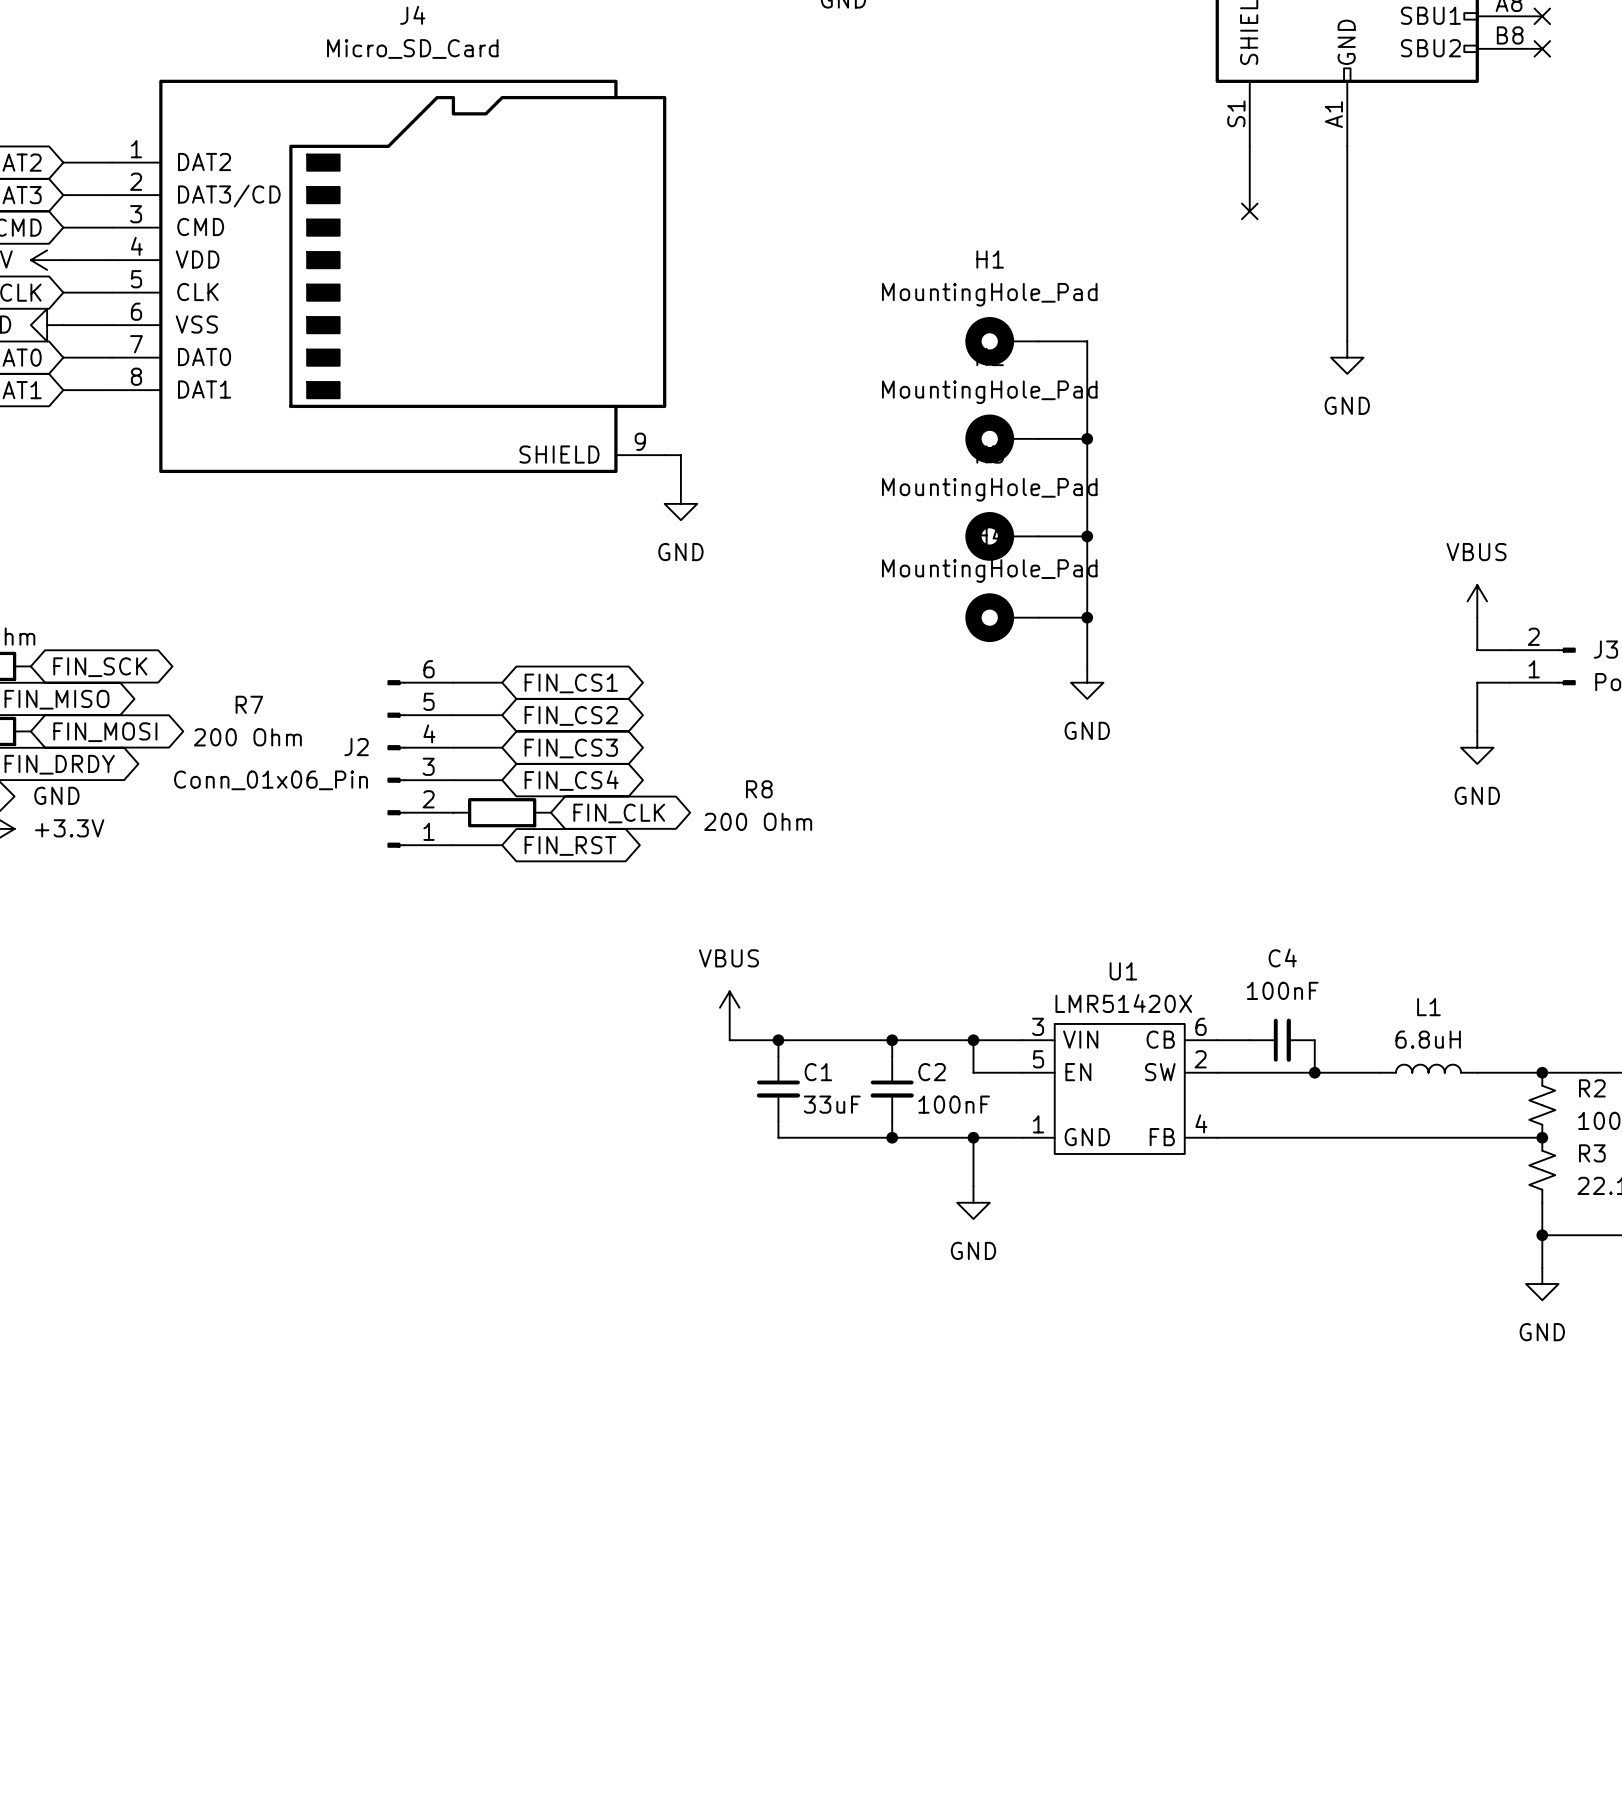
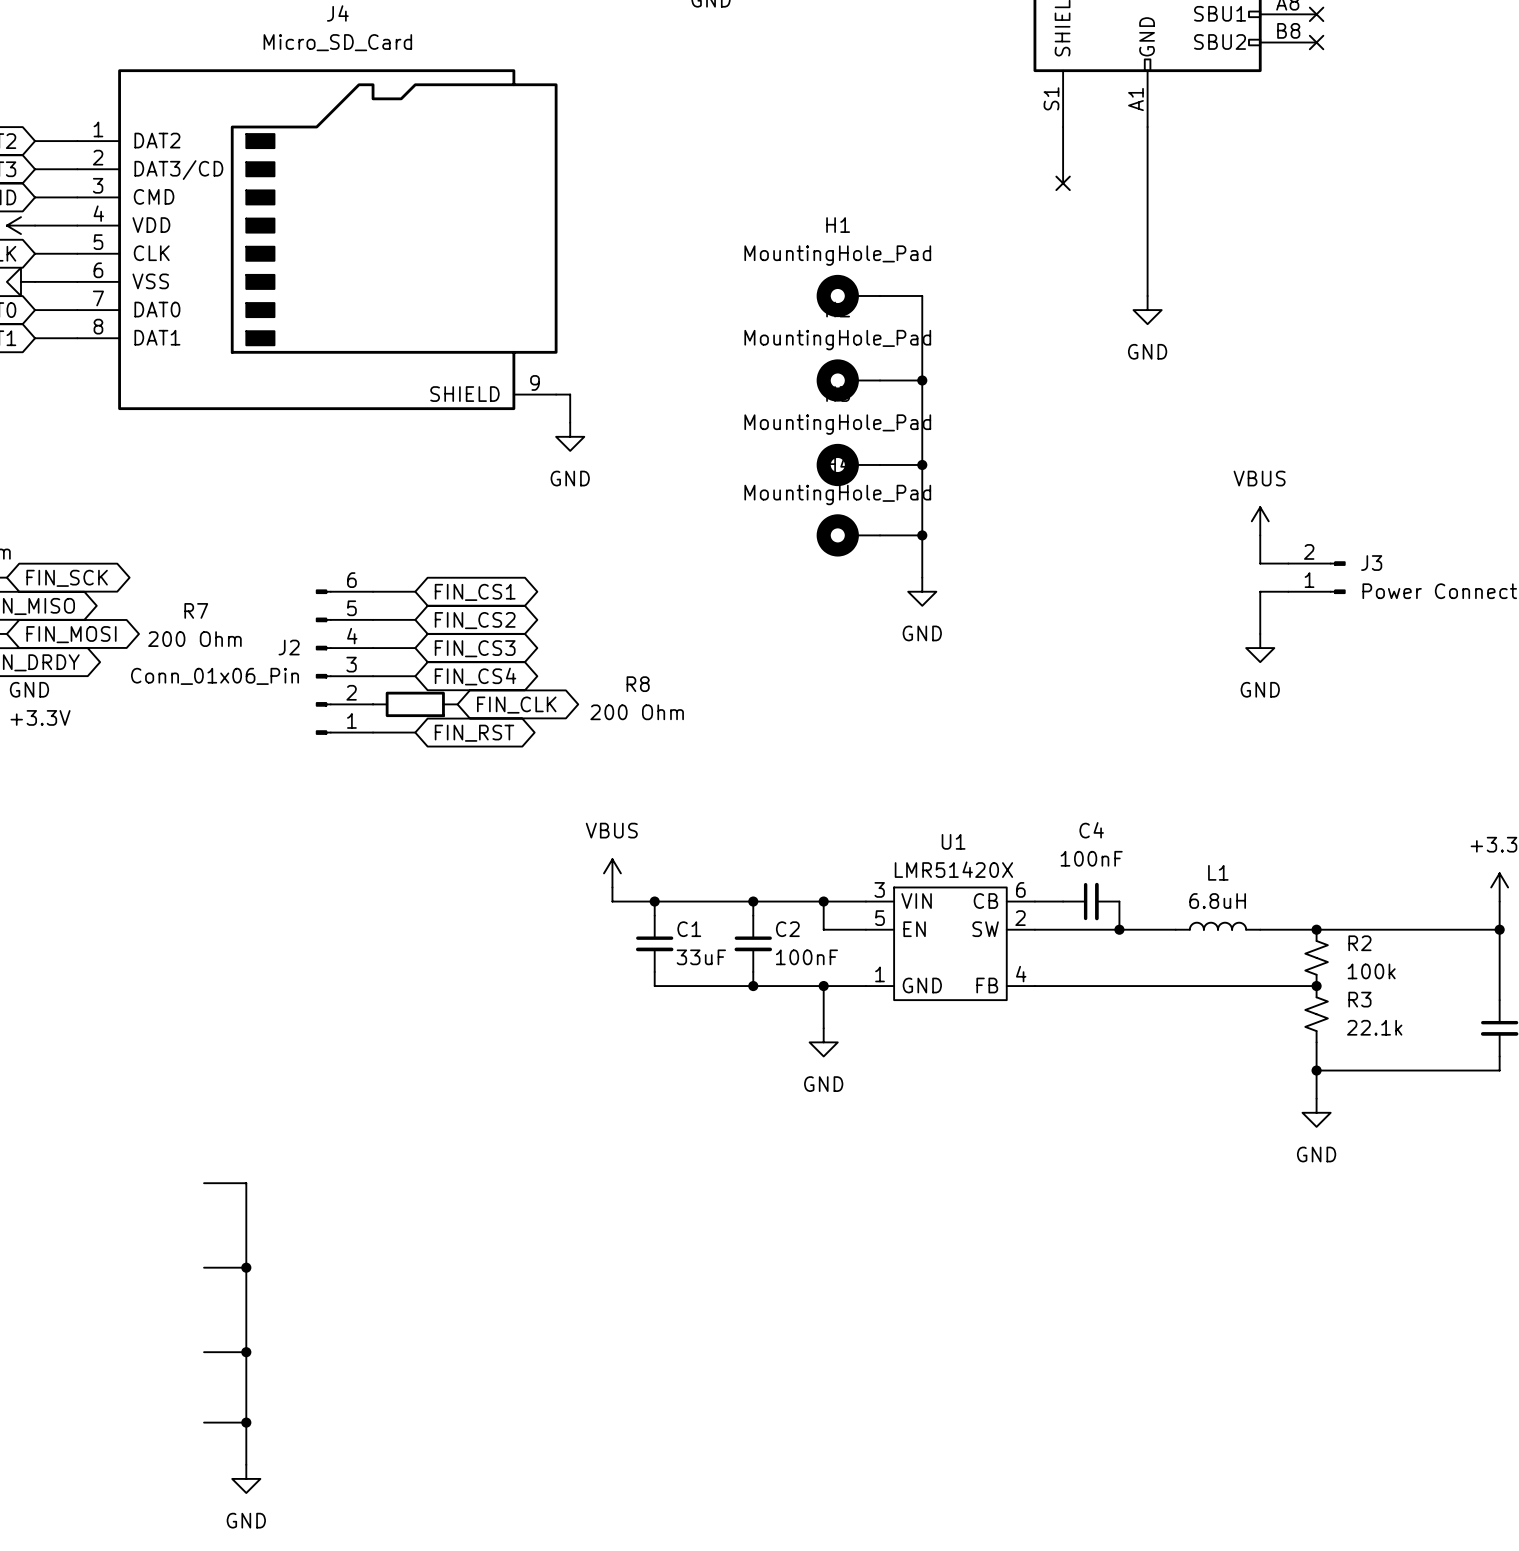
wire: none -> (204, 1183) (246, 1183) (246, 1464)
wire: none -> (204, 1267) (246, 1267)
junction: none -> (246, 1267)
wire: none -> (204, 1352) (246, 1352)
junction: none -> (246, 1352)
wire: none -> (204, 1422) (246, 1422)
junction: none -> (246, 1422)
power symbol: none -> GND (246, 1478)

